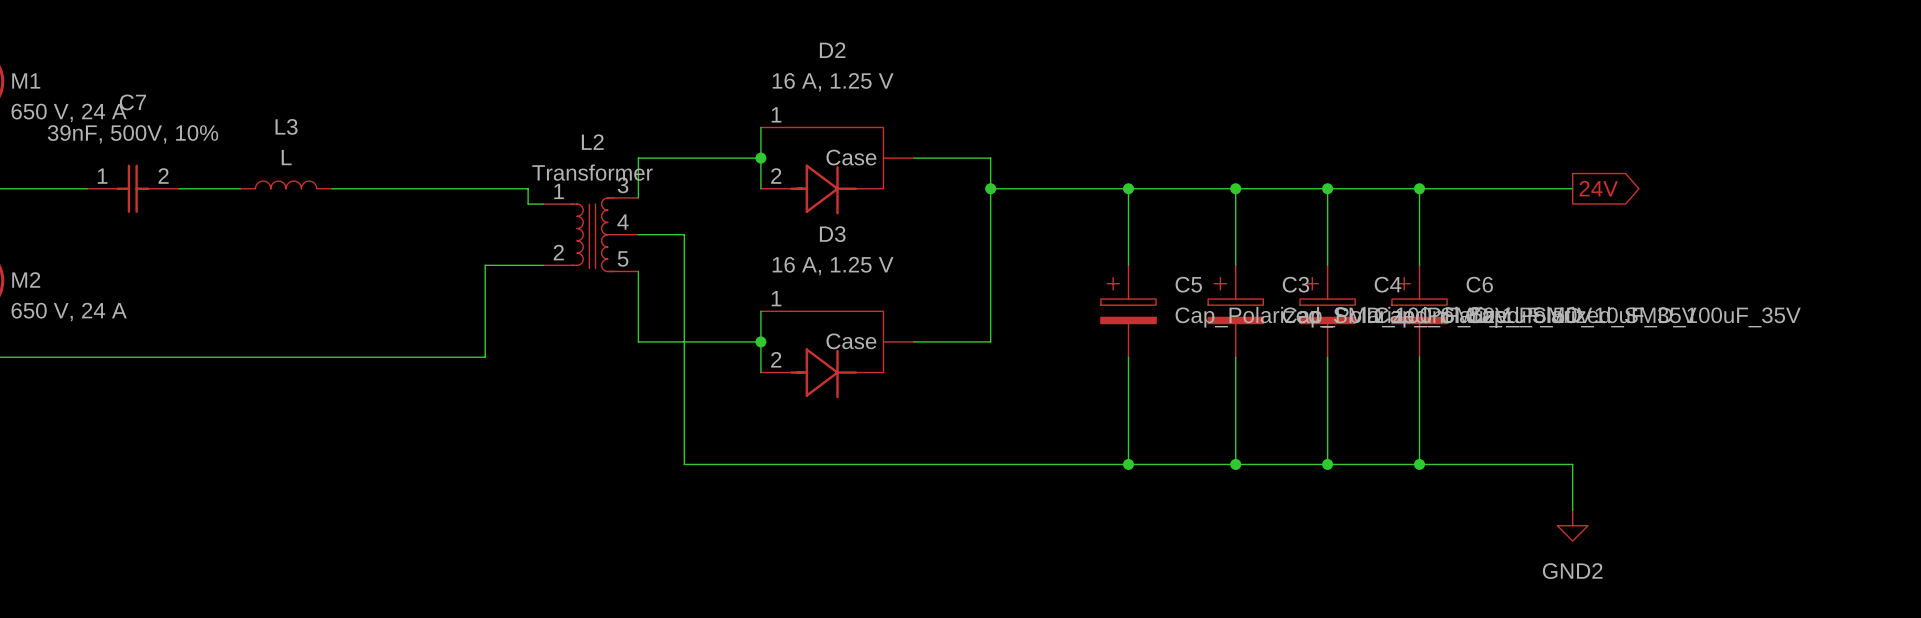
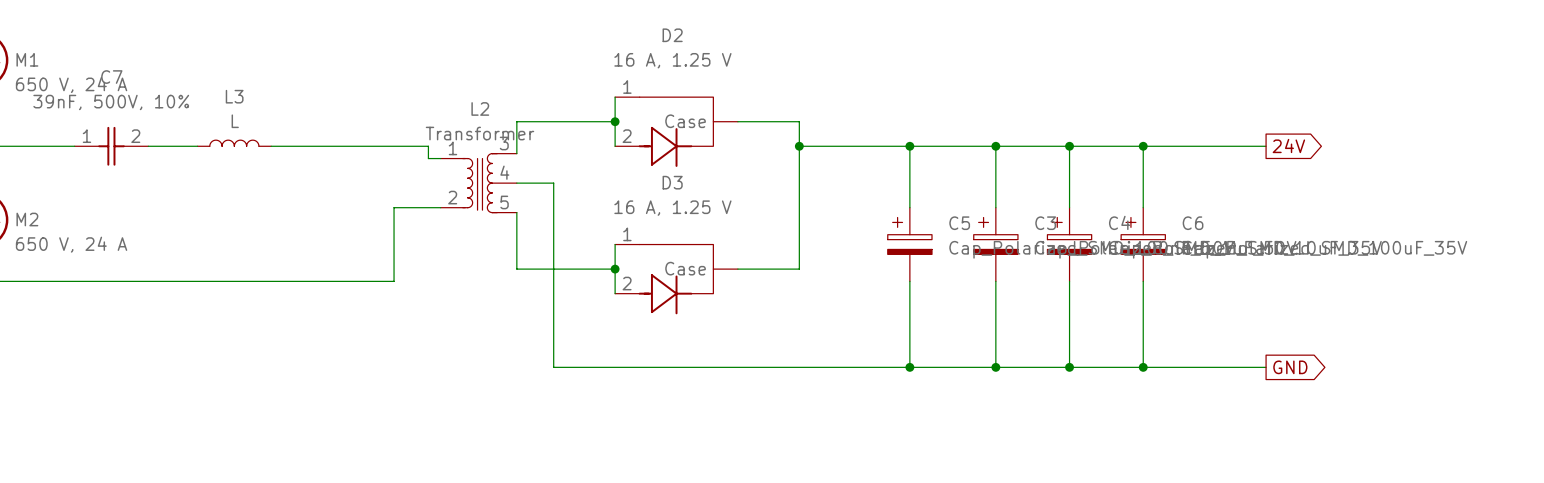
wire: (1572, 464) (1572, 510) -> none
global label: none -> GND (1290, 367)
power symbol: GND2 (1572, 525) -> none

